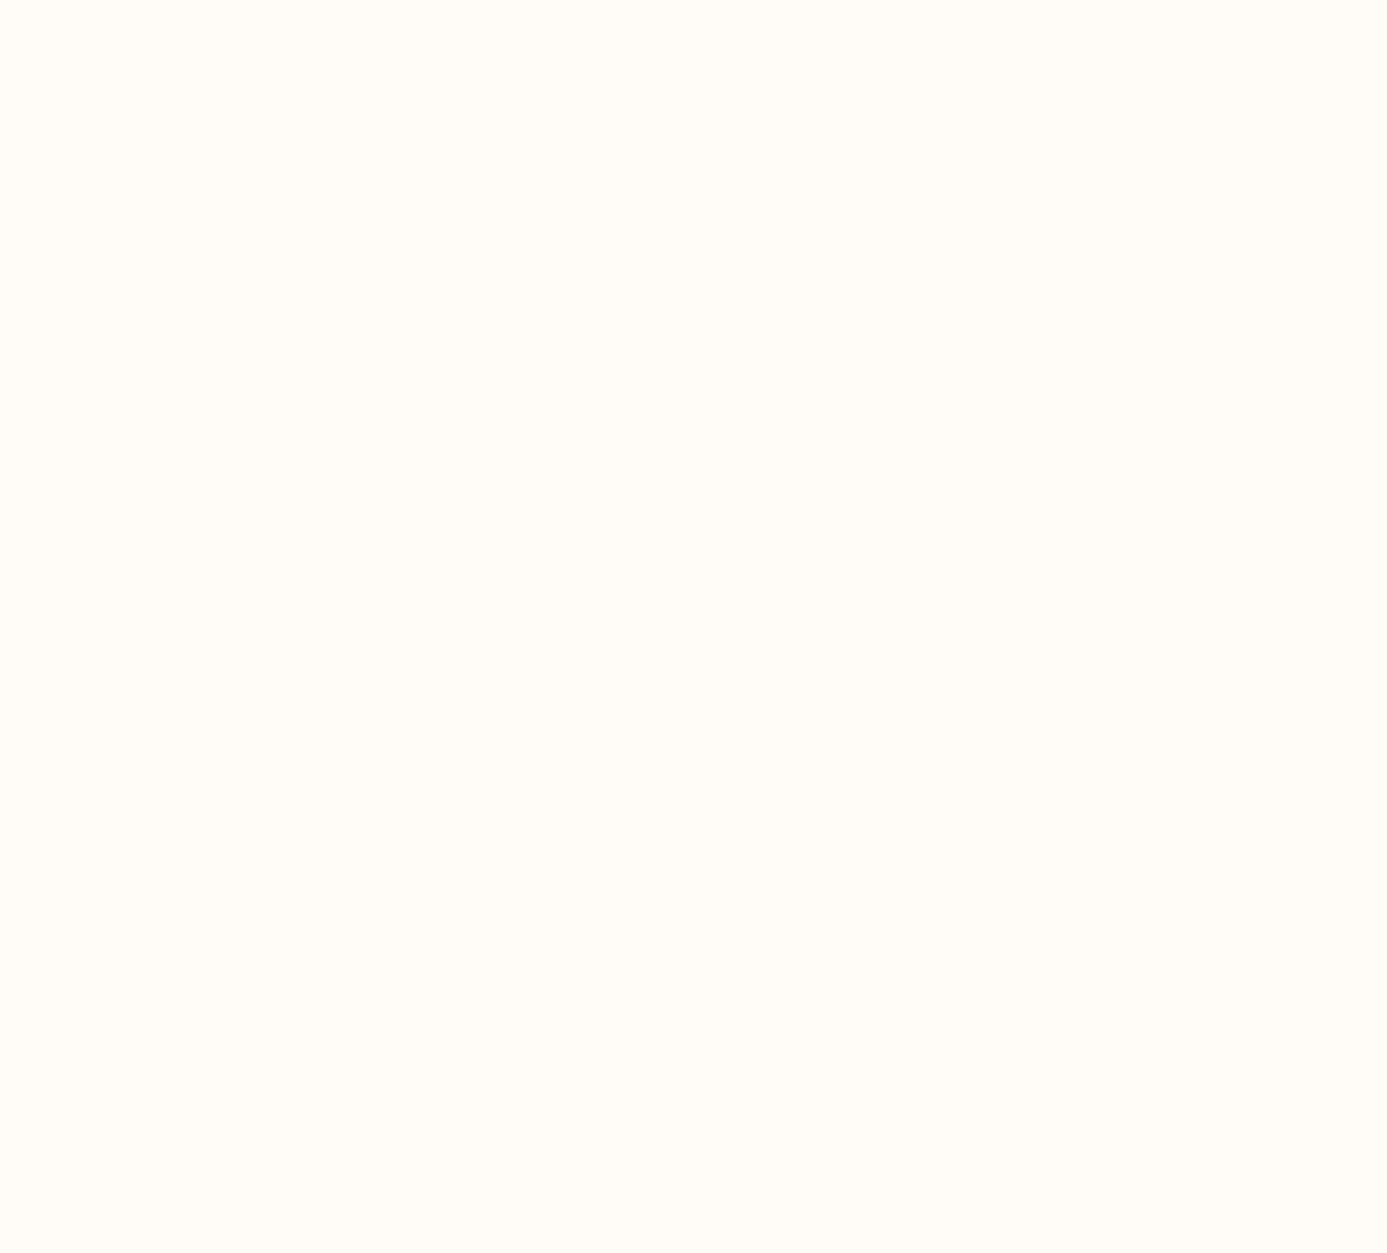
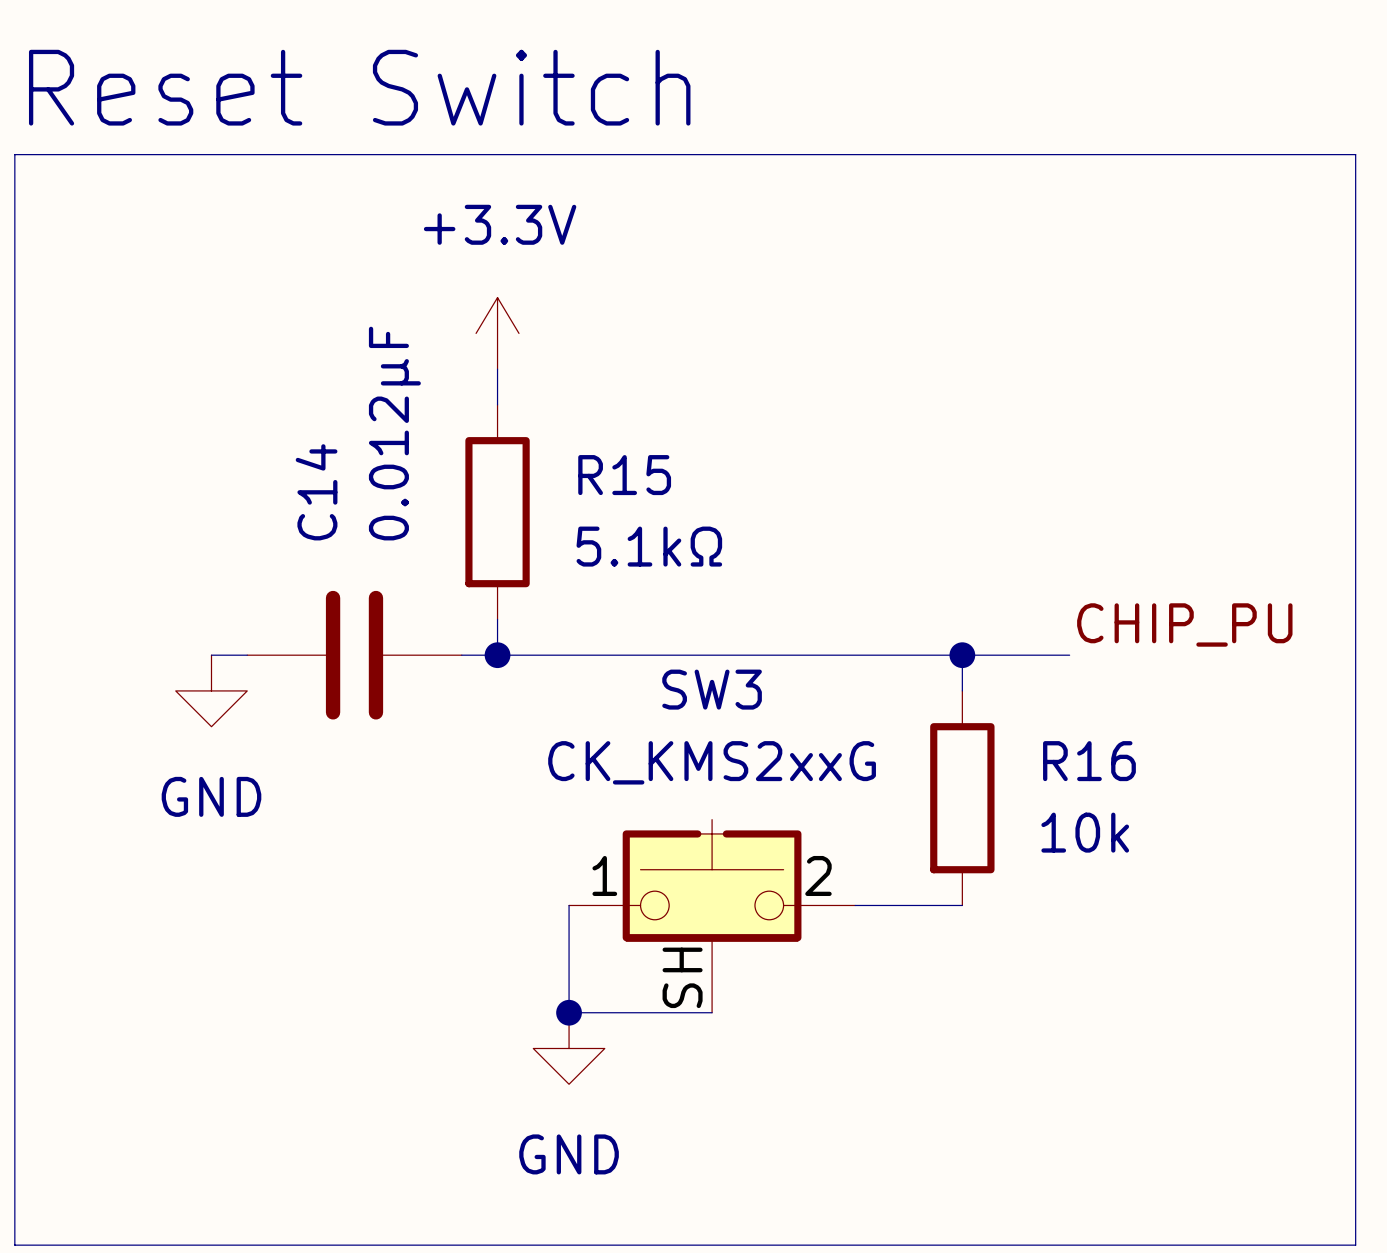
text: none -> Reset Switch (359, 87)
line: none -> (14, 154) (1355, 154) (1355, 1245) (14, 1245) (14, 154)
power symbol: none -> +3.3V (497, 333)
wire: none -> (497, 369) (497, 404)
R15: none -> 5.1kΩ (497, 512)
wire: none -> (497, 619) (497, 655)
label: none -> CHIP_PU (1184, 624)
wire: none -> (211, 655) (247, 655)
C14: none -> 0.012µF (354, 655)
wire: none -> (461, 655) (1069, 655)
junction: none -> (497, 655)
wire: none -> (962, 655) (962, 690)
junction: none -> (962, 655)
power symbol: none -> GND (211, 690)
R16: none -> 10k (962, 798)
wire: none -> (569, 905) (569, 1012) (712, 1012)
wire: none -> (855, 905) (962, 905)
SW3: none -> CK_KMS2xxG (712, 916)
junction: none -> (569, 1012)
power symbol: none -> GND (569, 1048)

